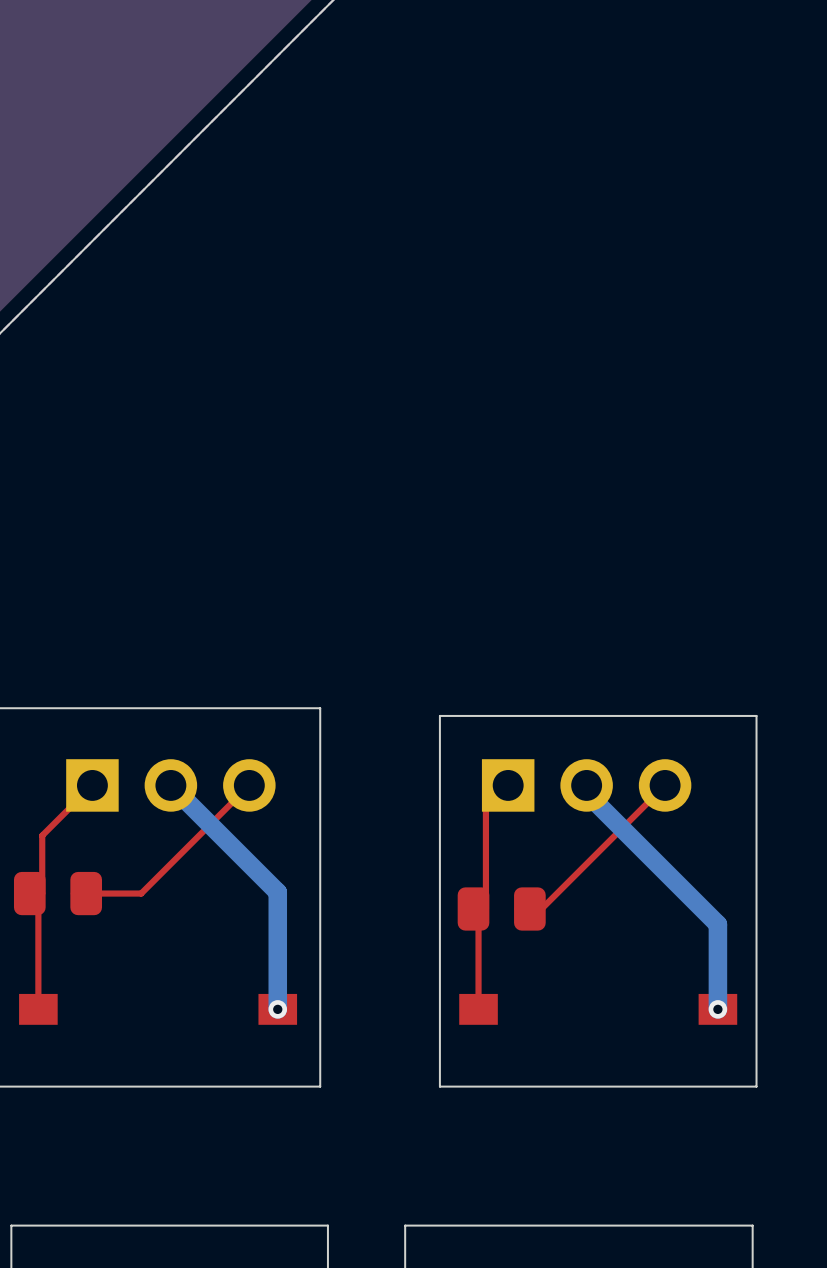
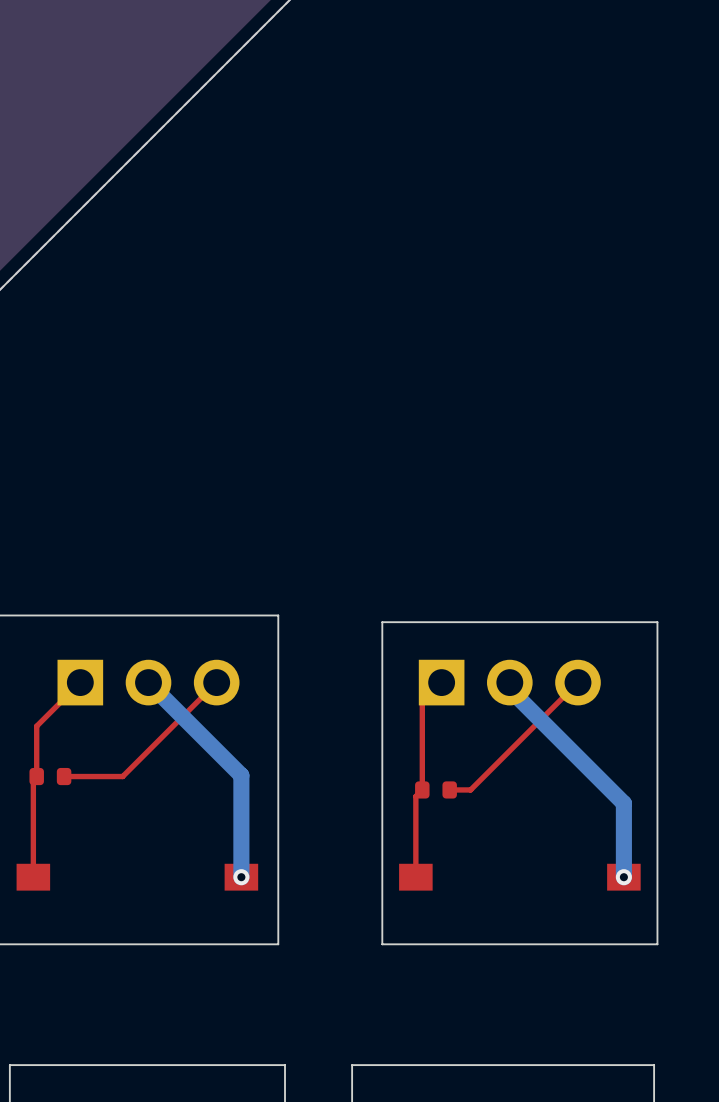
part footprint: [13, 871, 103, 916] -> [29, 767, 72, 786]
part footprint: [457, 887, 546, 931] -> [415, 781, 457, 799]

